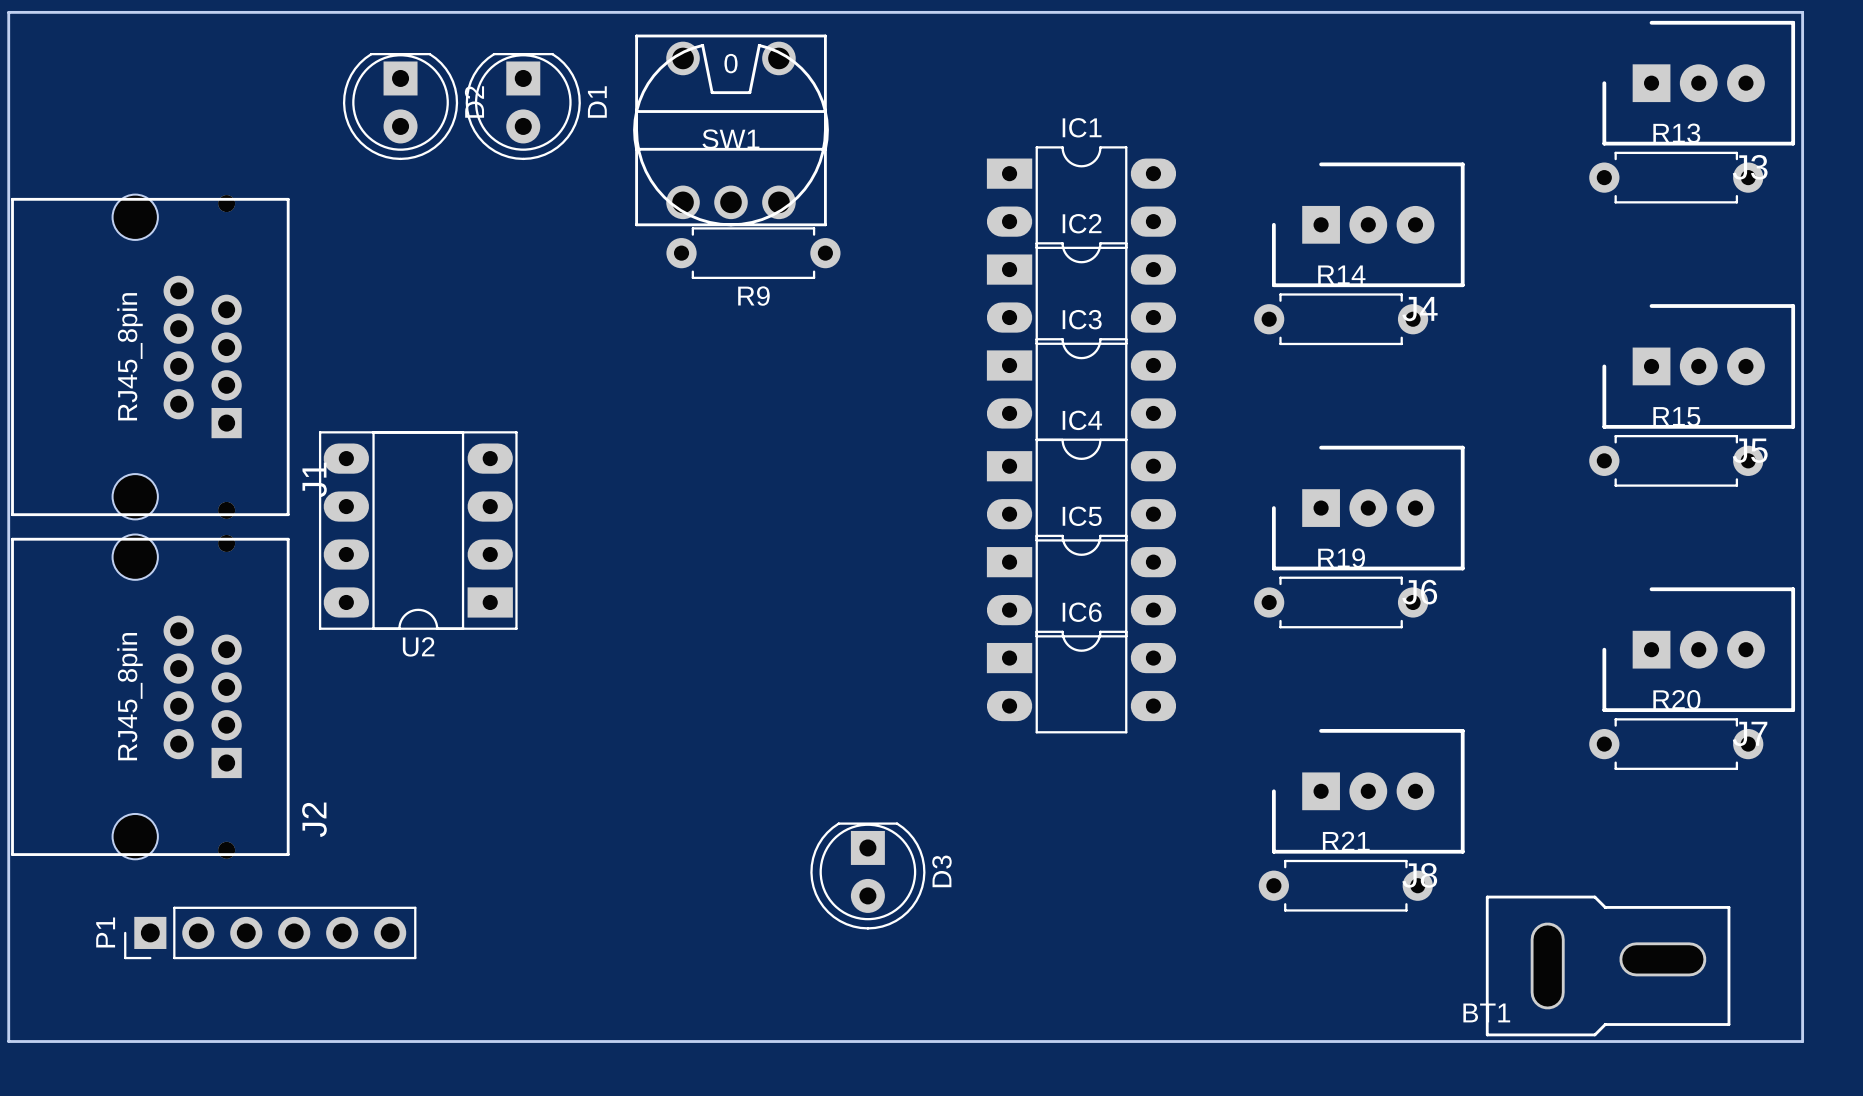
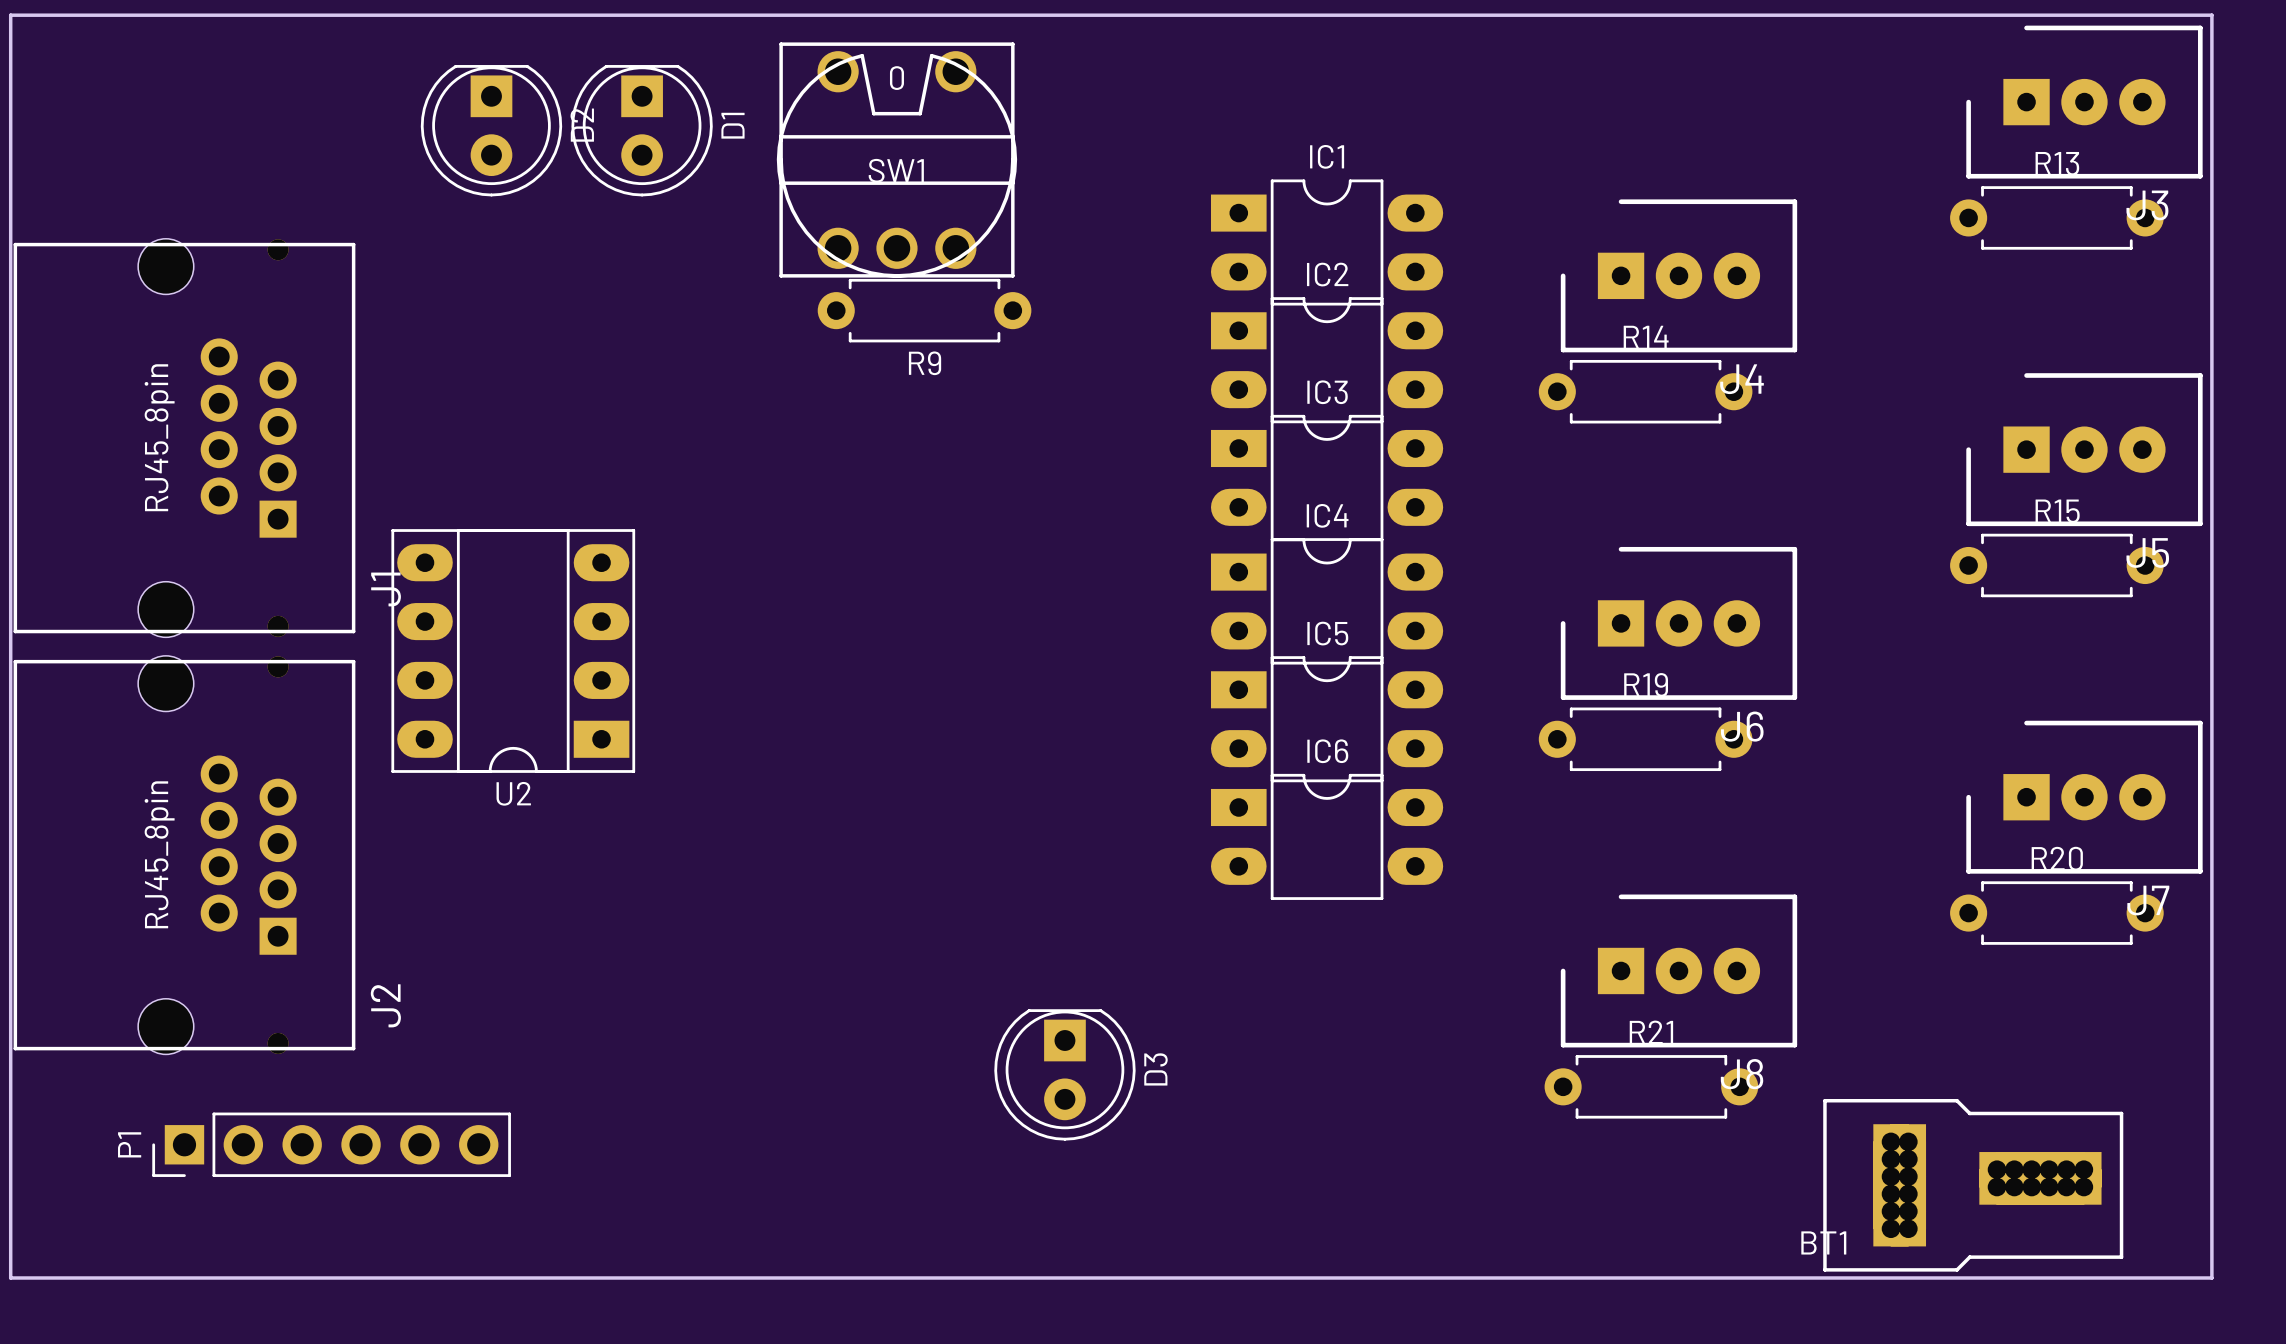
BT1 footprint: [1485, 895, 1731, 1037] -> [1823, 1099, 2124, 1272]

